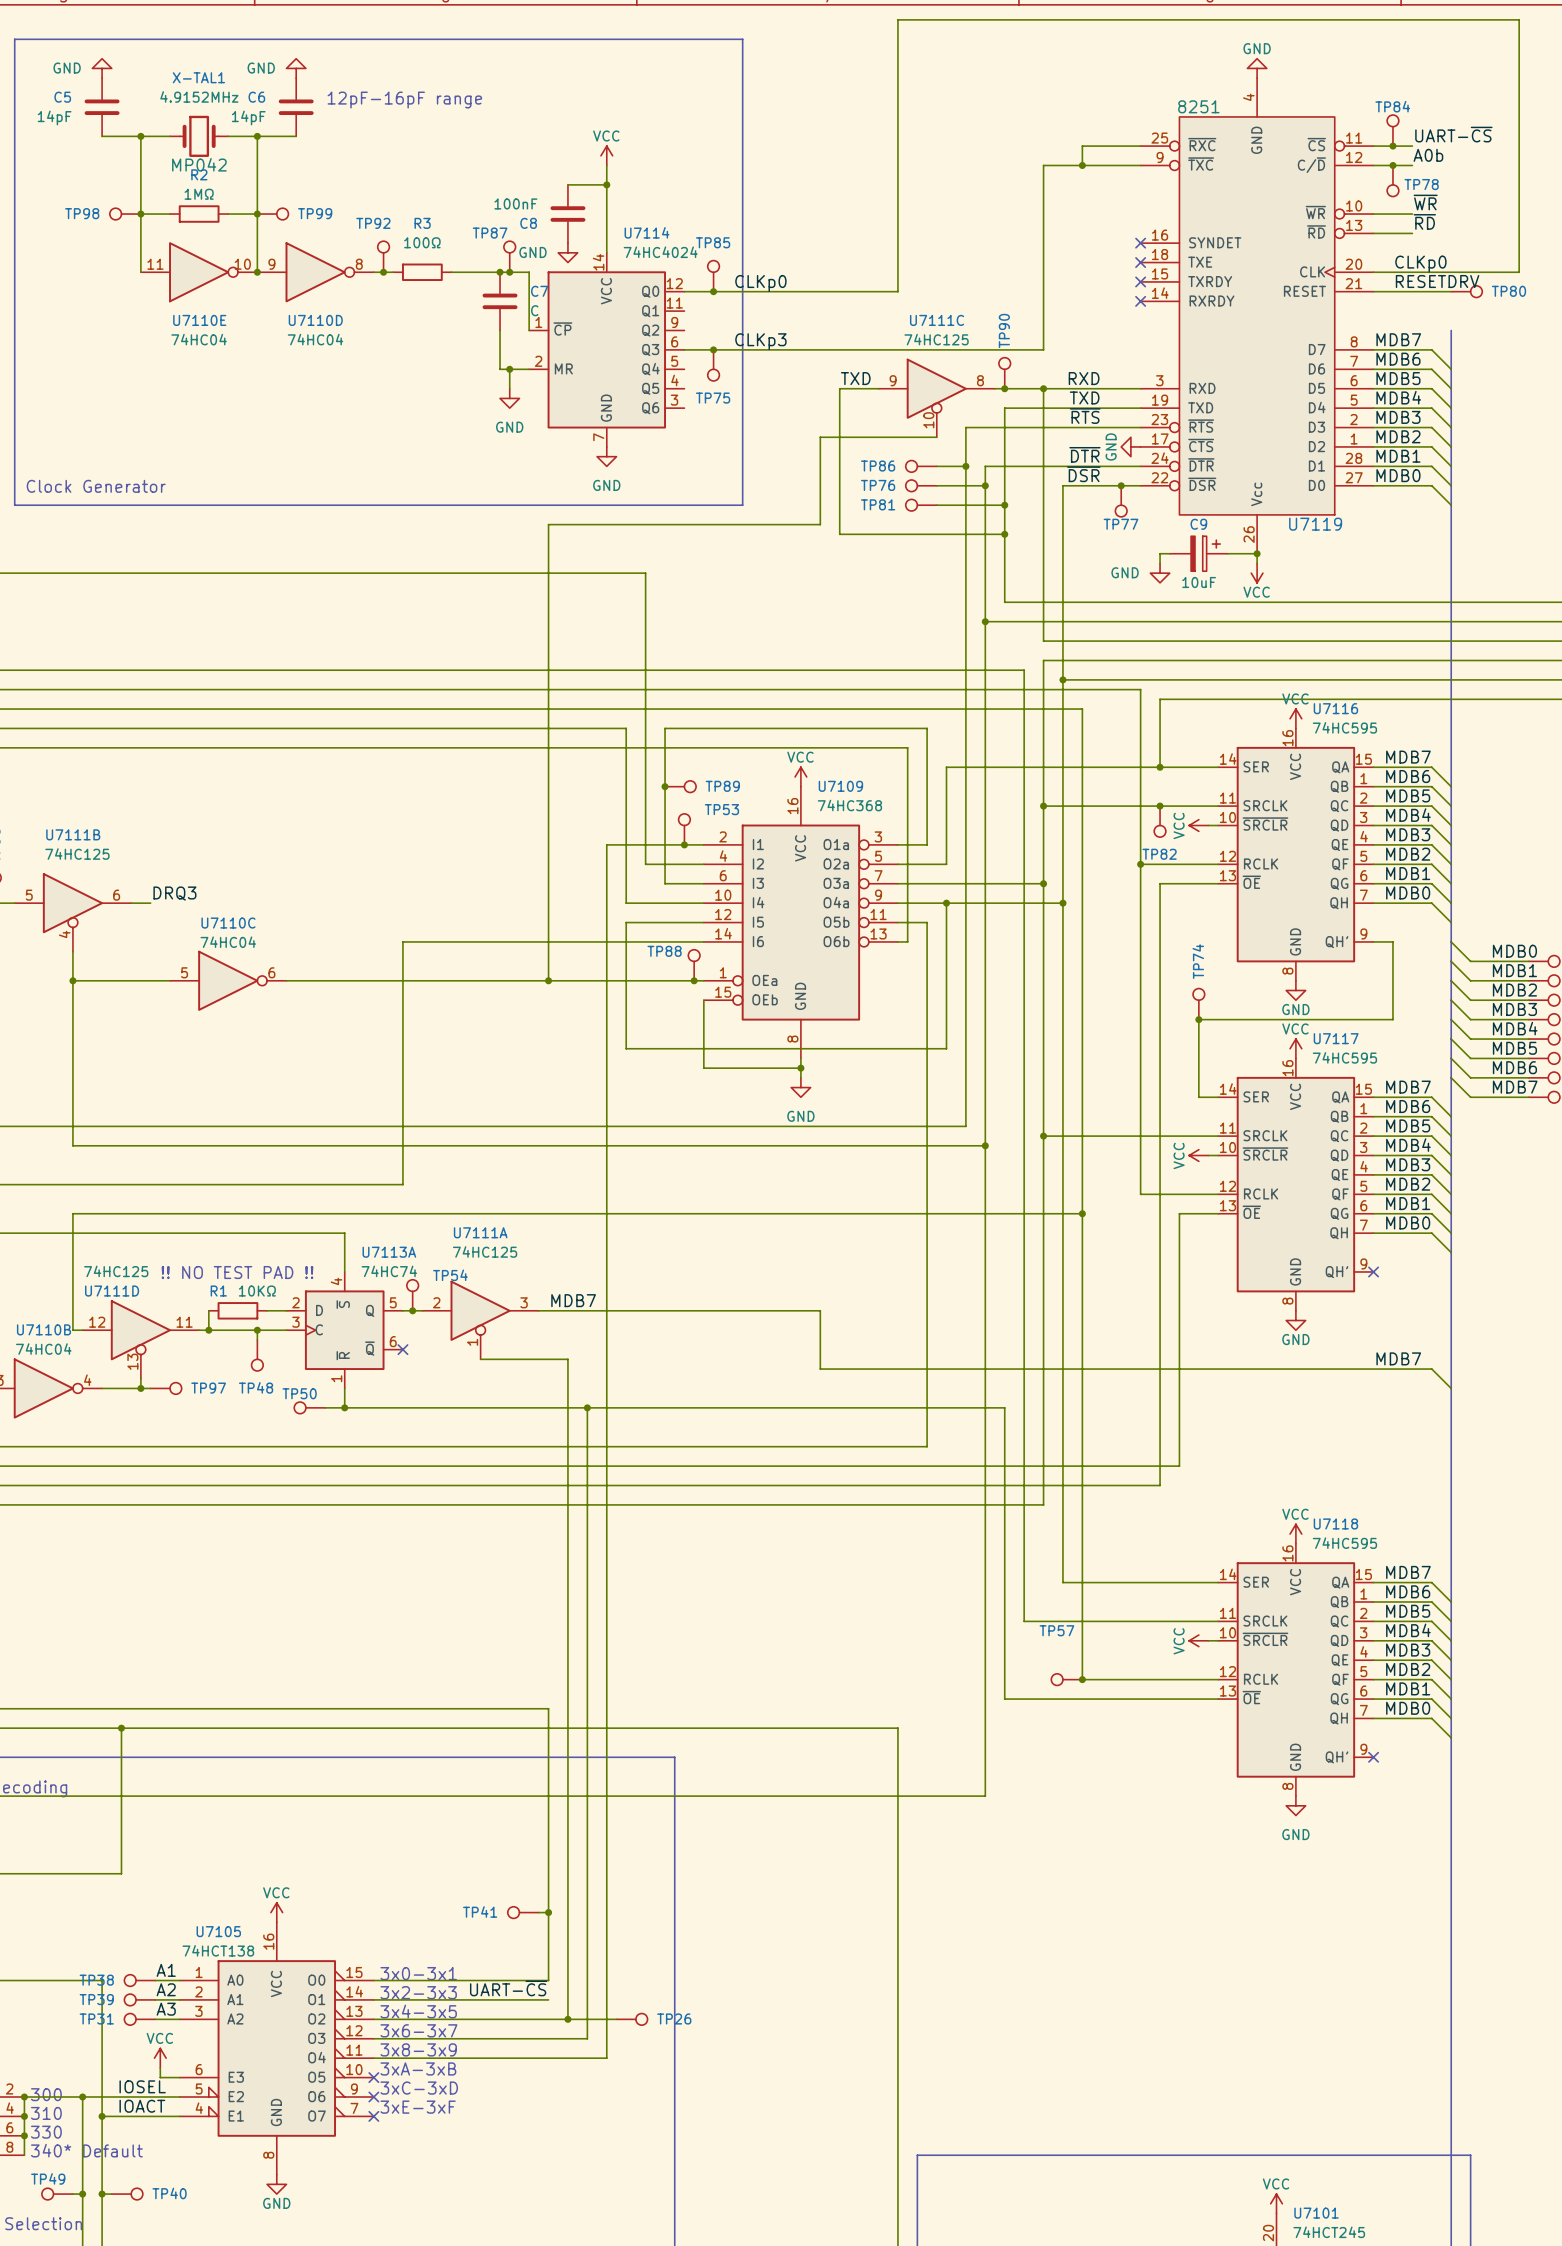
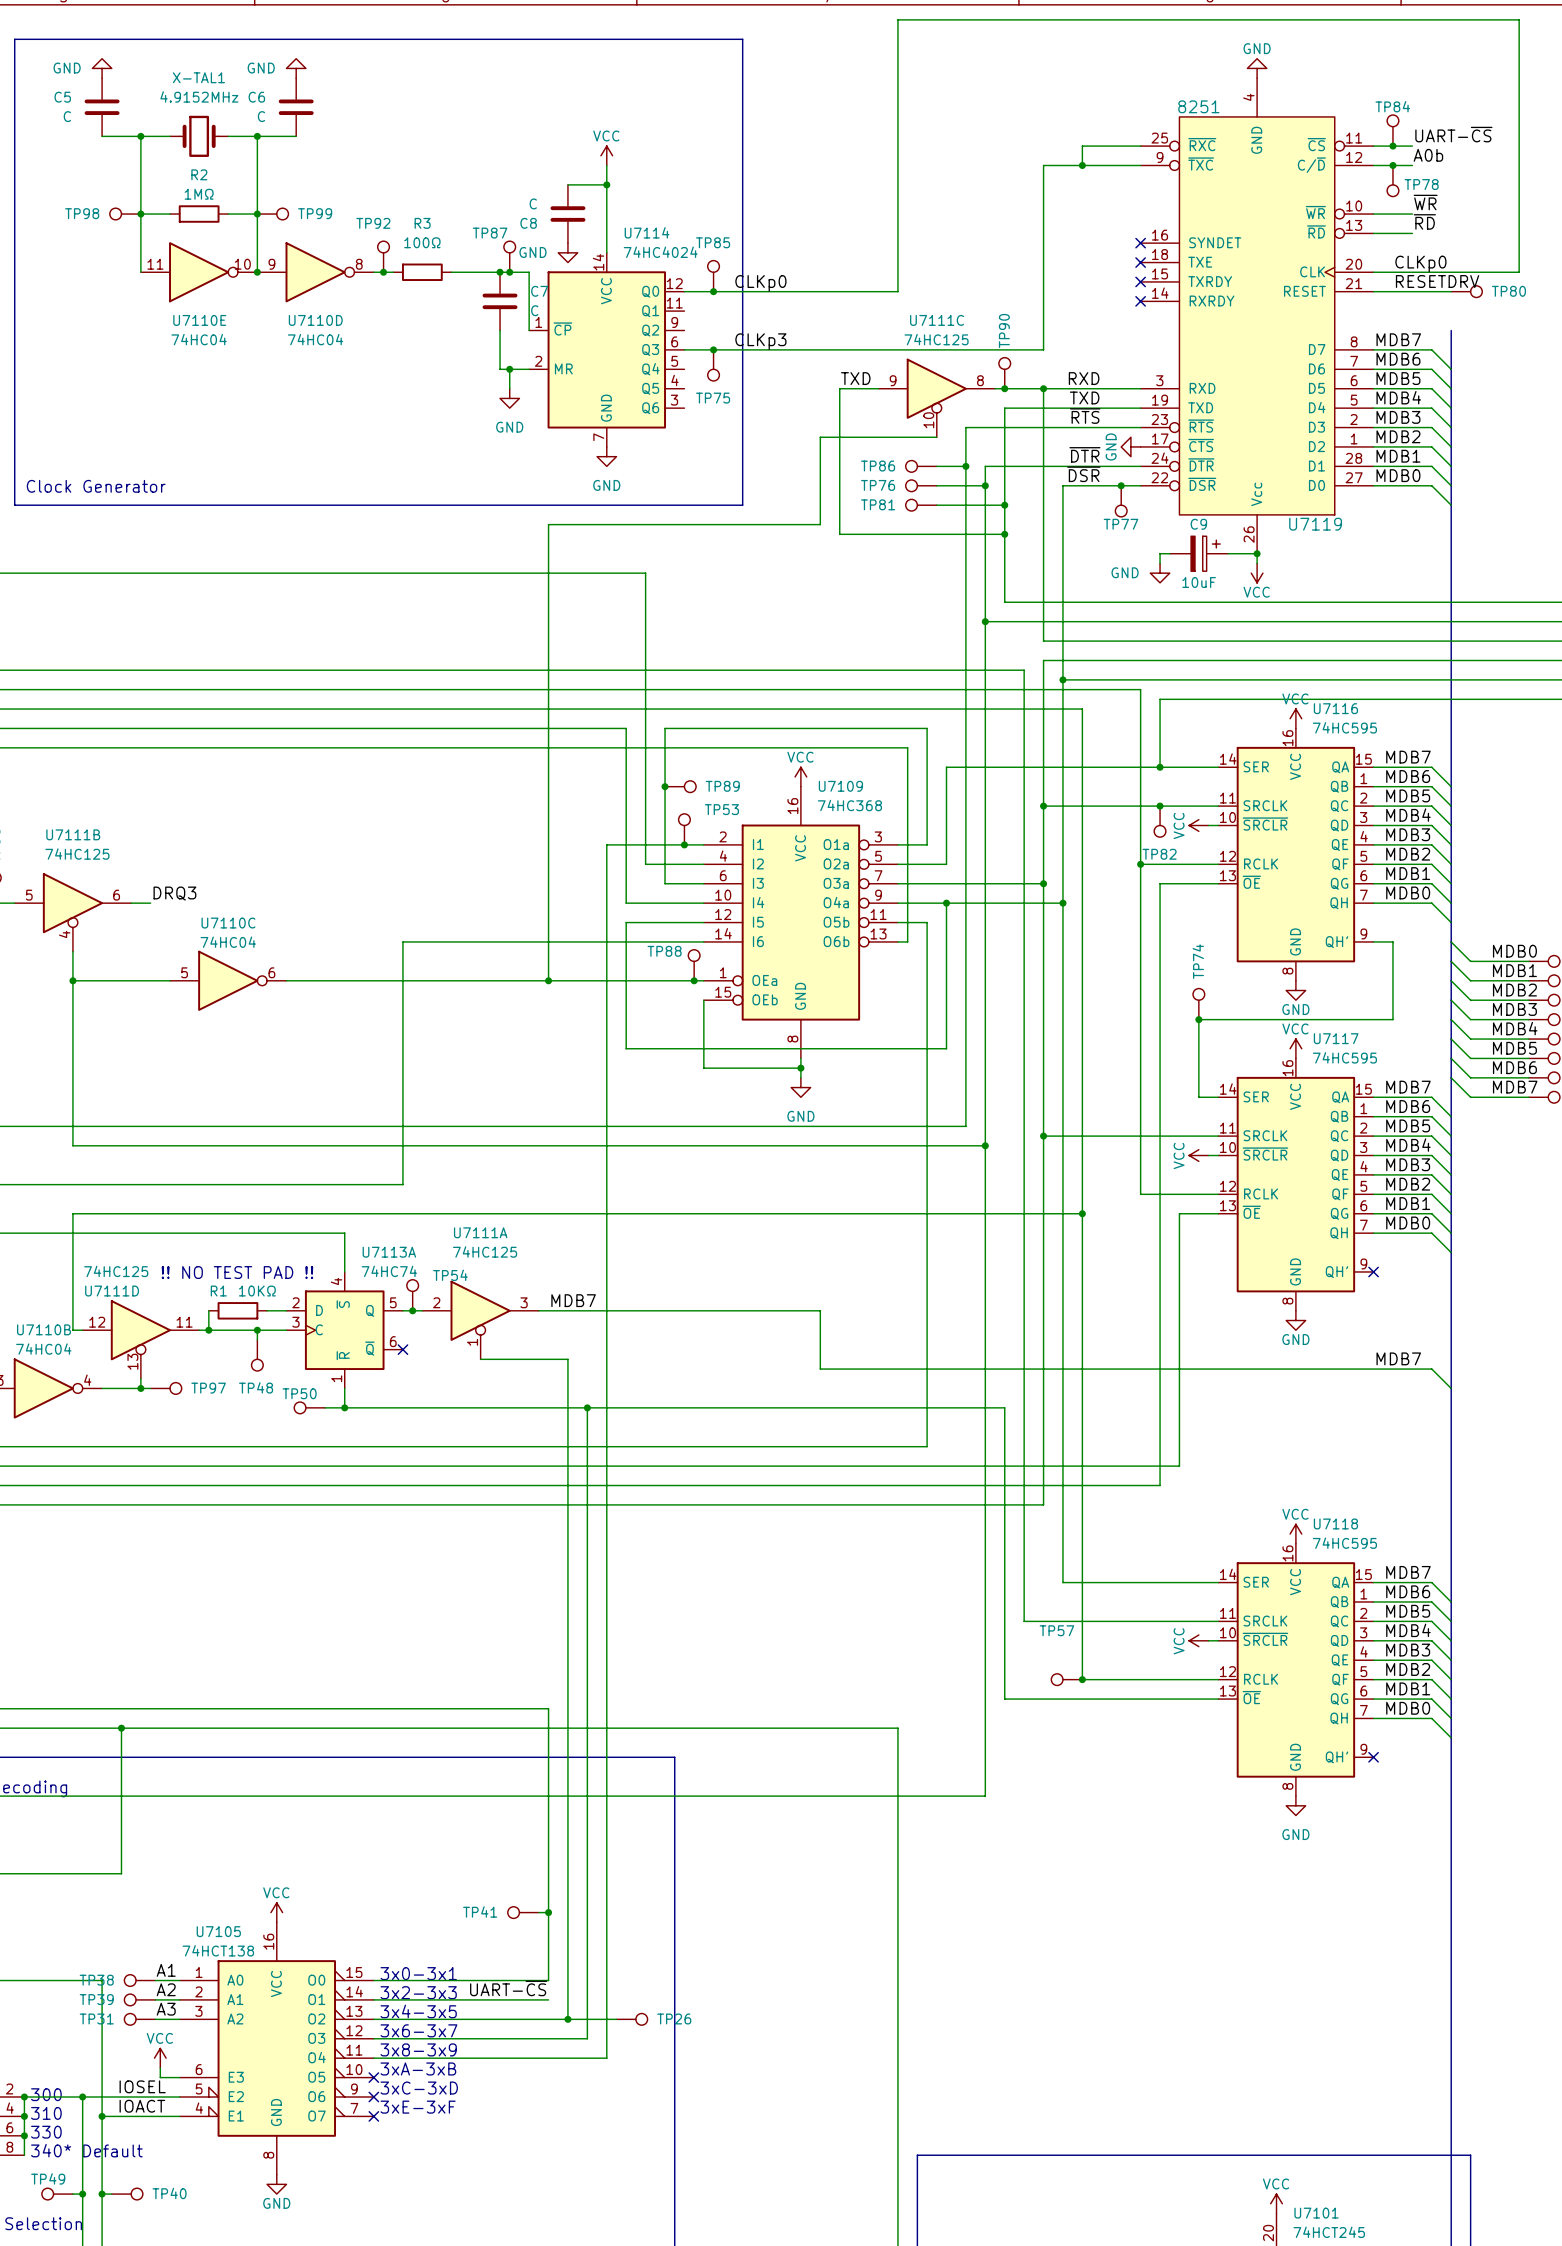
text: 12pF-16pF range (404, 100) -> none
C5 value: 14pF (54, 117) -> C (67, 116)
C6 value: 14pF (248, 117) -> C (261, 116)
X-TAL1 text: MP042 (199, 164) -> none
C8 value: 100nF (515, 203) -> C (533, 203)

